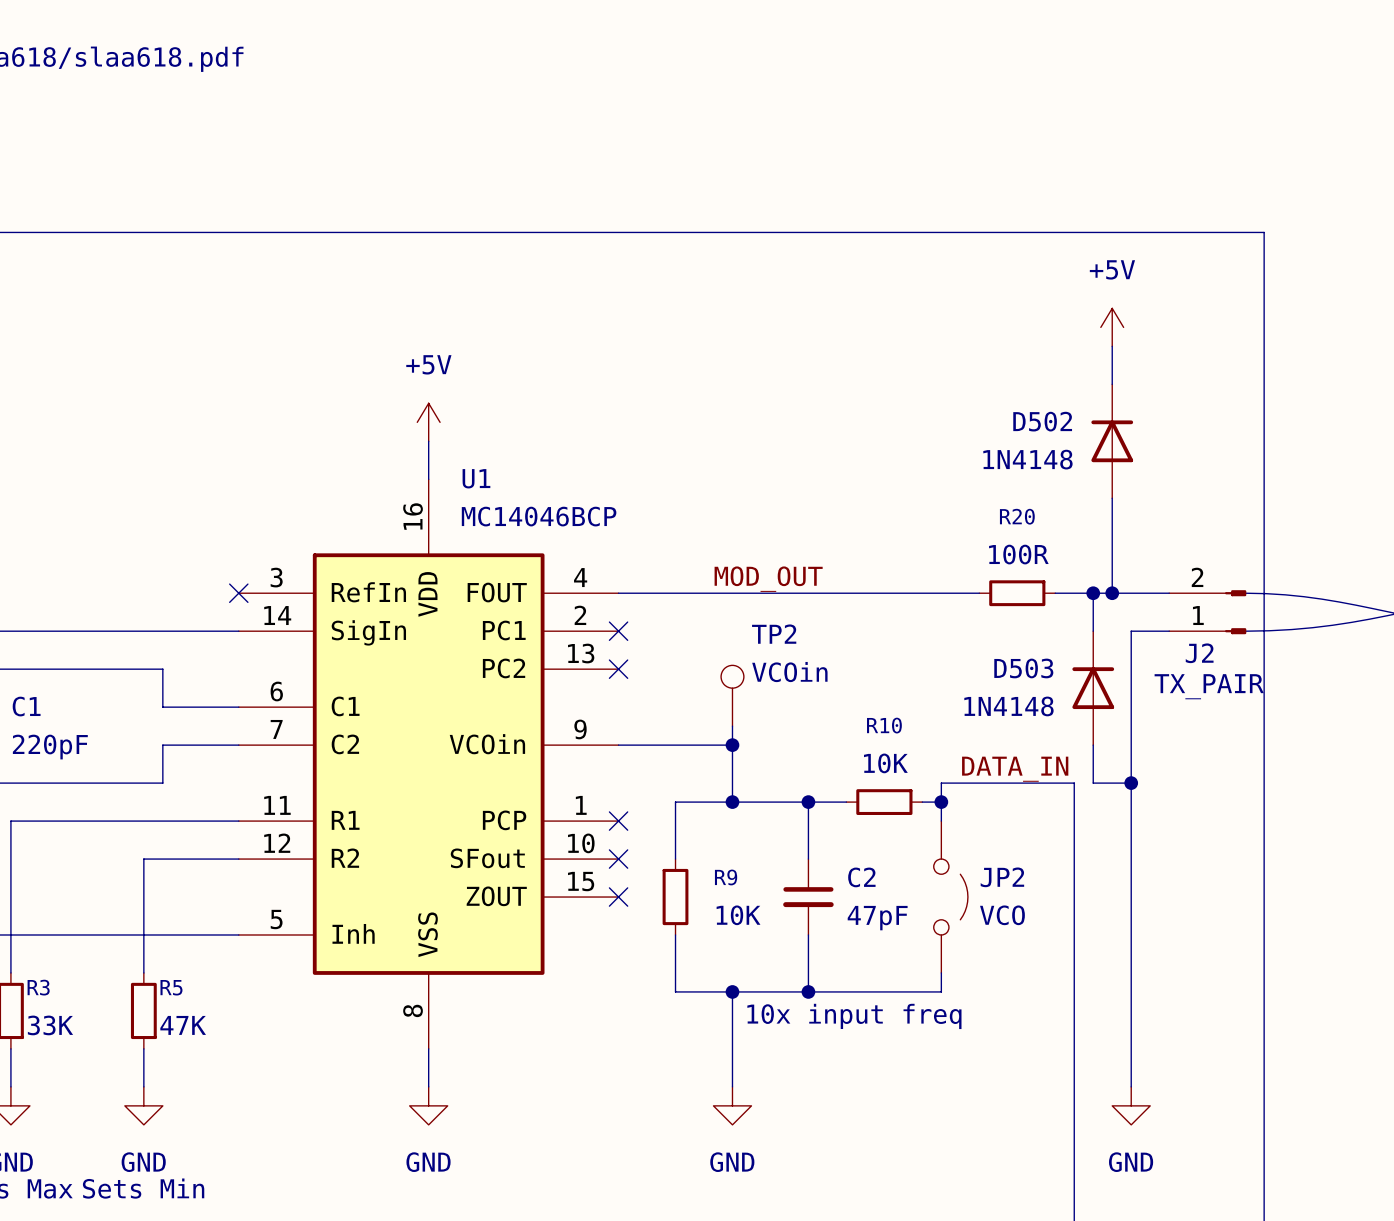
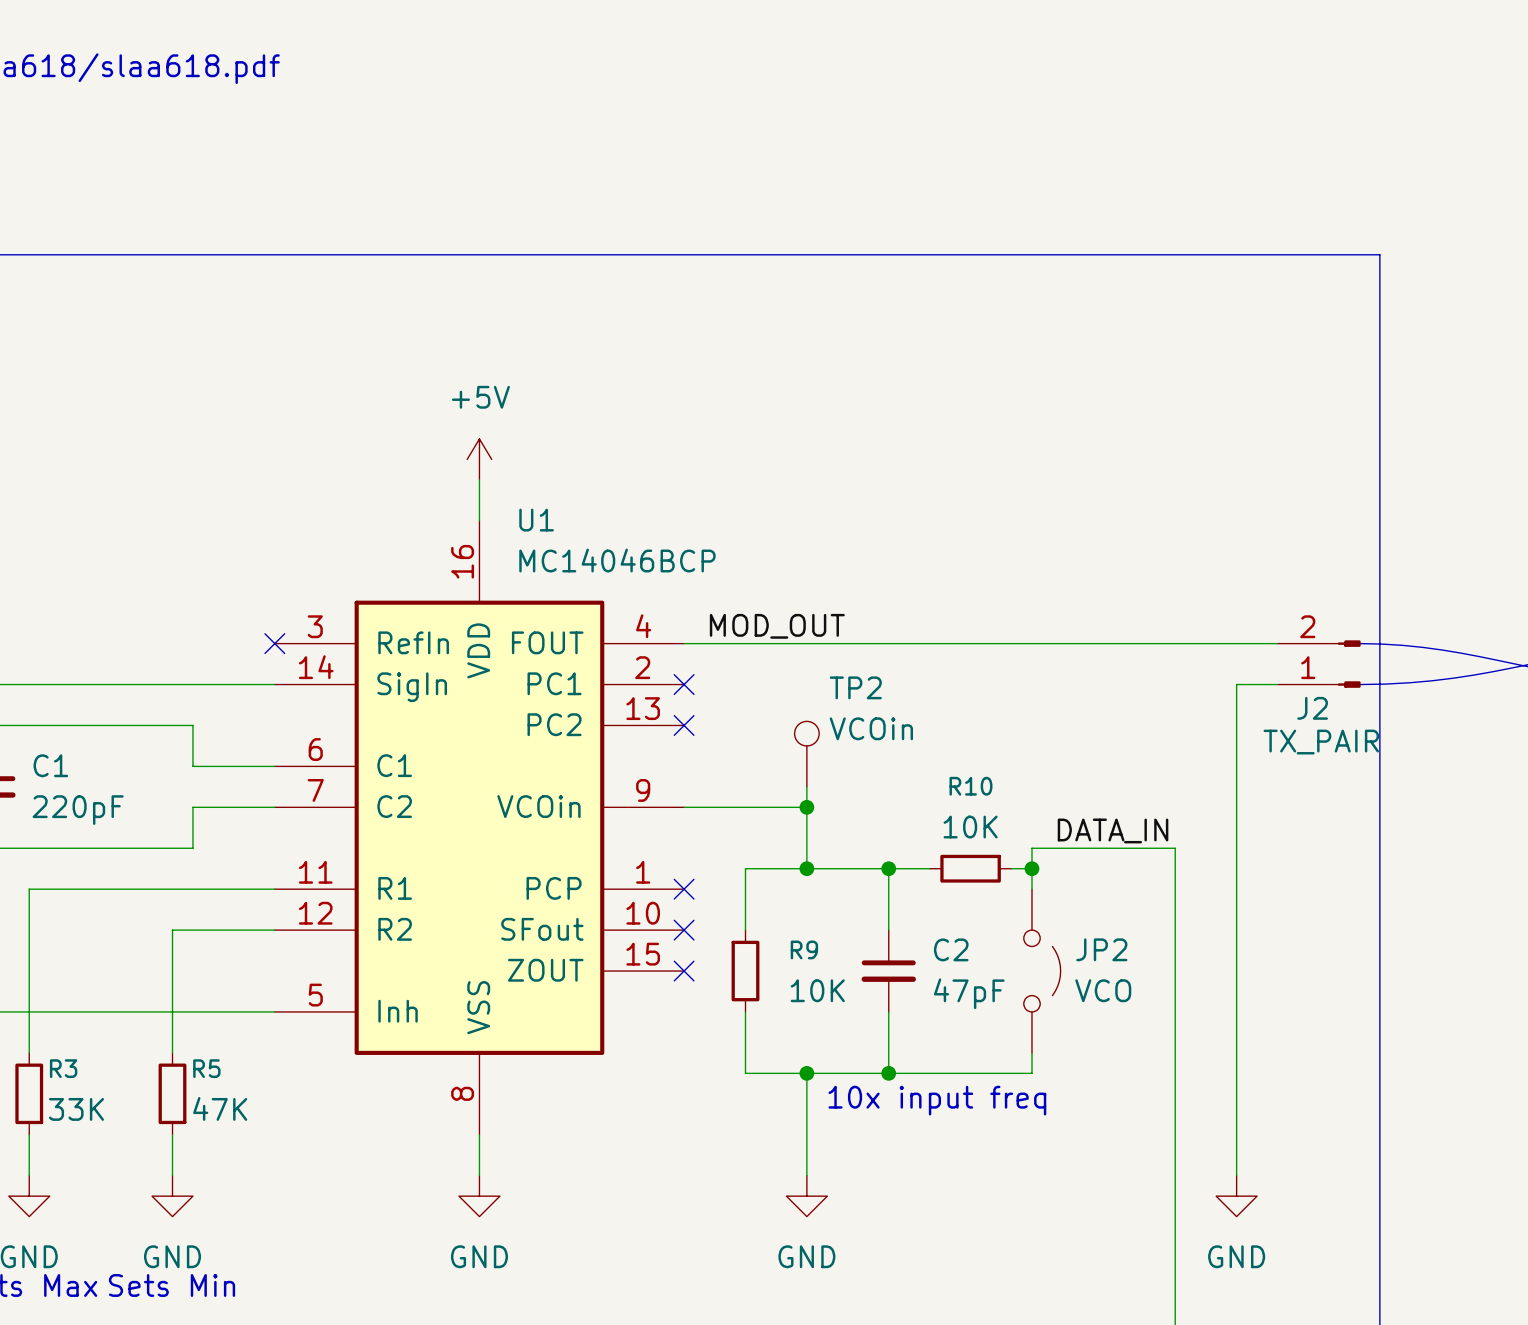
power symbol: +5V (1112, 327) -> none
wire: (1112, 346) (1112, 384) -> none
D502: 1N4148 (1112, 441) -> none
wire: (1112, 498) (1112, 593) -> none
label position: MOD_OUT (768, 579) -> MOD_OUT (777, 626)
wire: none -> (1072, 643) (1154, 643)
R20: 100R (1017, 593) -> none
wire: (1093, 593) (1093, 631) -> none
junction: (1093, 593) -> none
junction: (1112, 593) -> none
D503: 1N4148 (1093, 688) -> none
wire: (1093, 745) (1093, 783) (1131, 783) -> none
junction: (1131, 783) -> none

